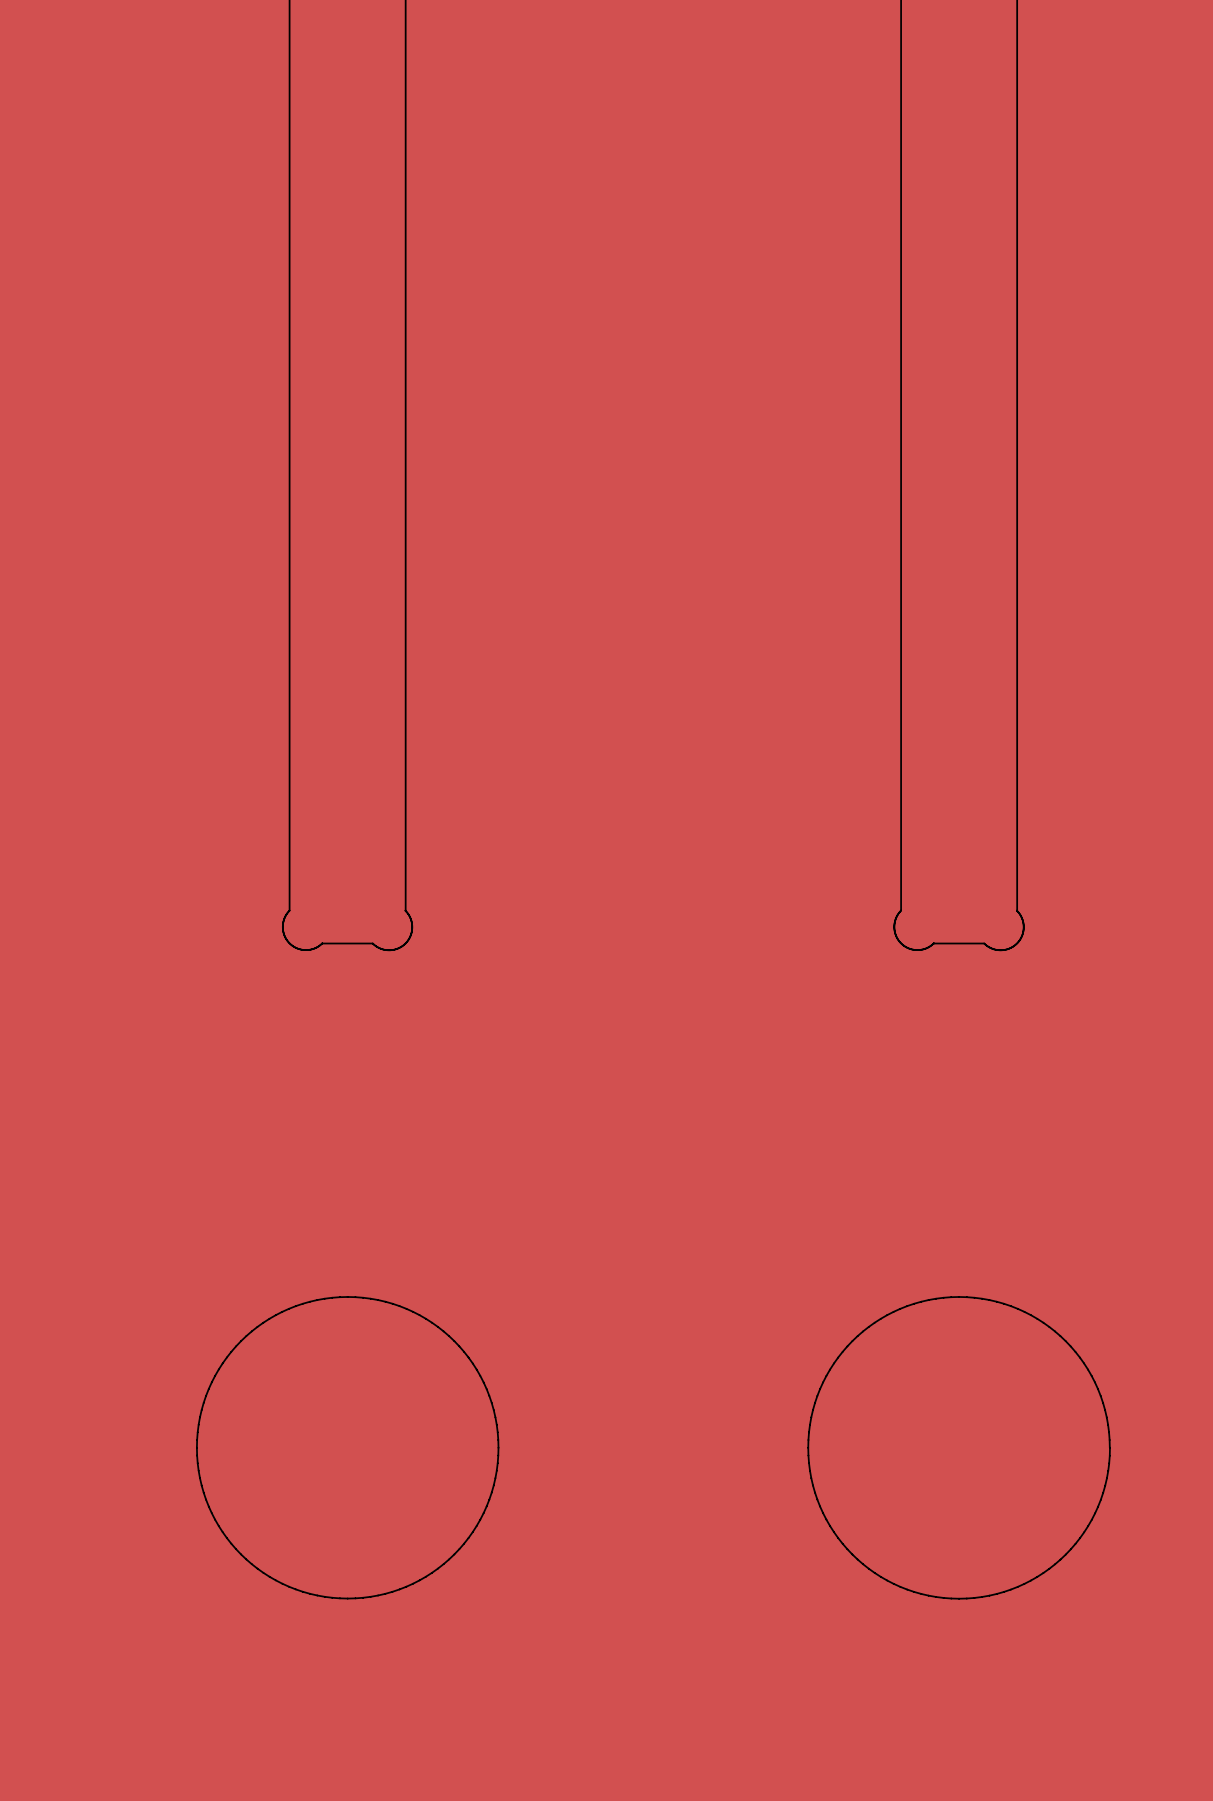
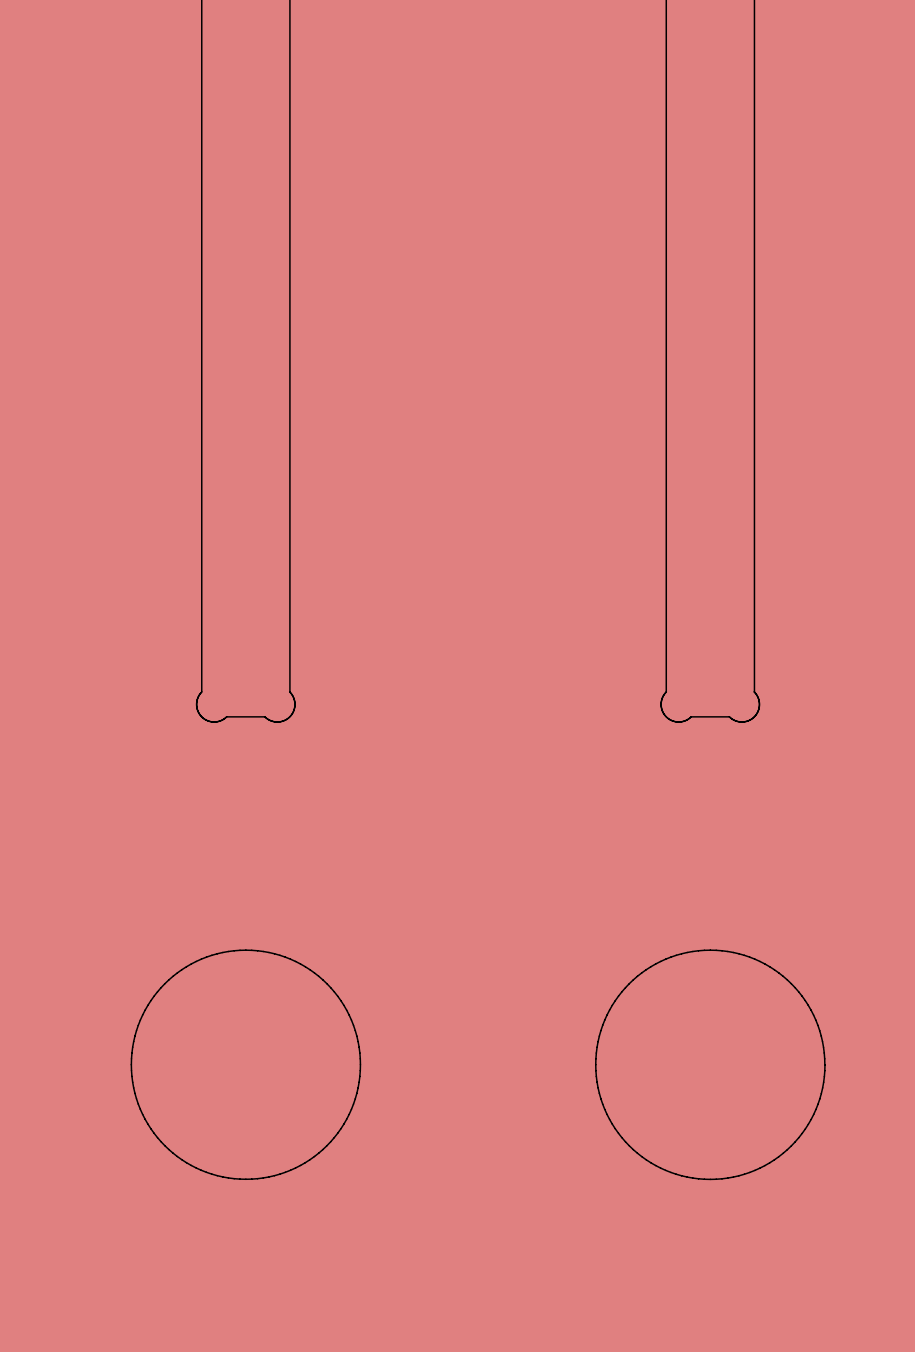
board edge: (289, 910) (284, 918) (282, 926) (284, 935) (289, 943) (297, 948) (305, 950) (314, 948) (322, 943) -> (201, 656) (201, 691) (197, 698) (196, 706) (200, 714) (207, 720) (217, 721) (226, 716) (264, 716) (273, 721) (283, 721) (290, 716) (294, 708) (294, 699) (289, 691)
board edge: (405, 910) (411, 920) (411, 931) (407, 941) (397, 948) (384, 949) (372, 943) (322, 943) -> (289, 656) (289, 691)
board edge: (901, 910) (896, 918) (894, 926) (896, 935) (901, 943) (908, 948) (917, 950) (926, 948) (933, 943) -> none
board edge: (1016, 910) (1022, 920) (1023, 931) (1018, 941) (1009, 948) (996, 949) (984, 943) (933, 943) -> (754, 656) (754, 691) (758, 699) (759, 707) (752, 718) (741, 721) (729, 716) (691, 716) (678, 721) (666, 717) (662, 711) (661, 704) (666, 691) (666, 656)

